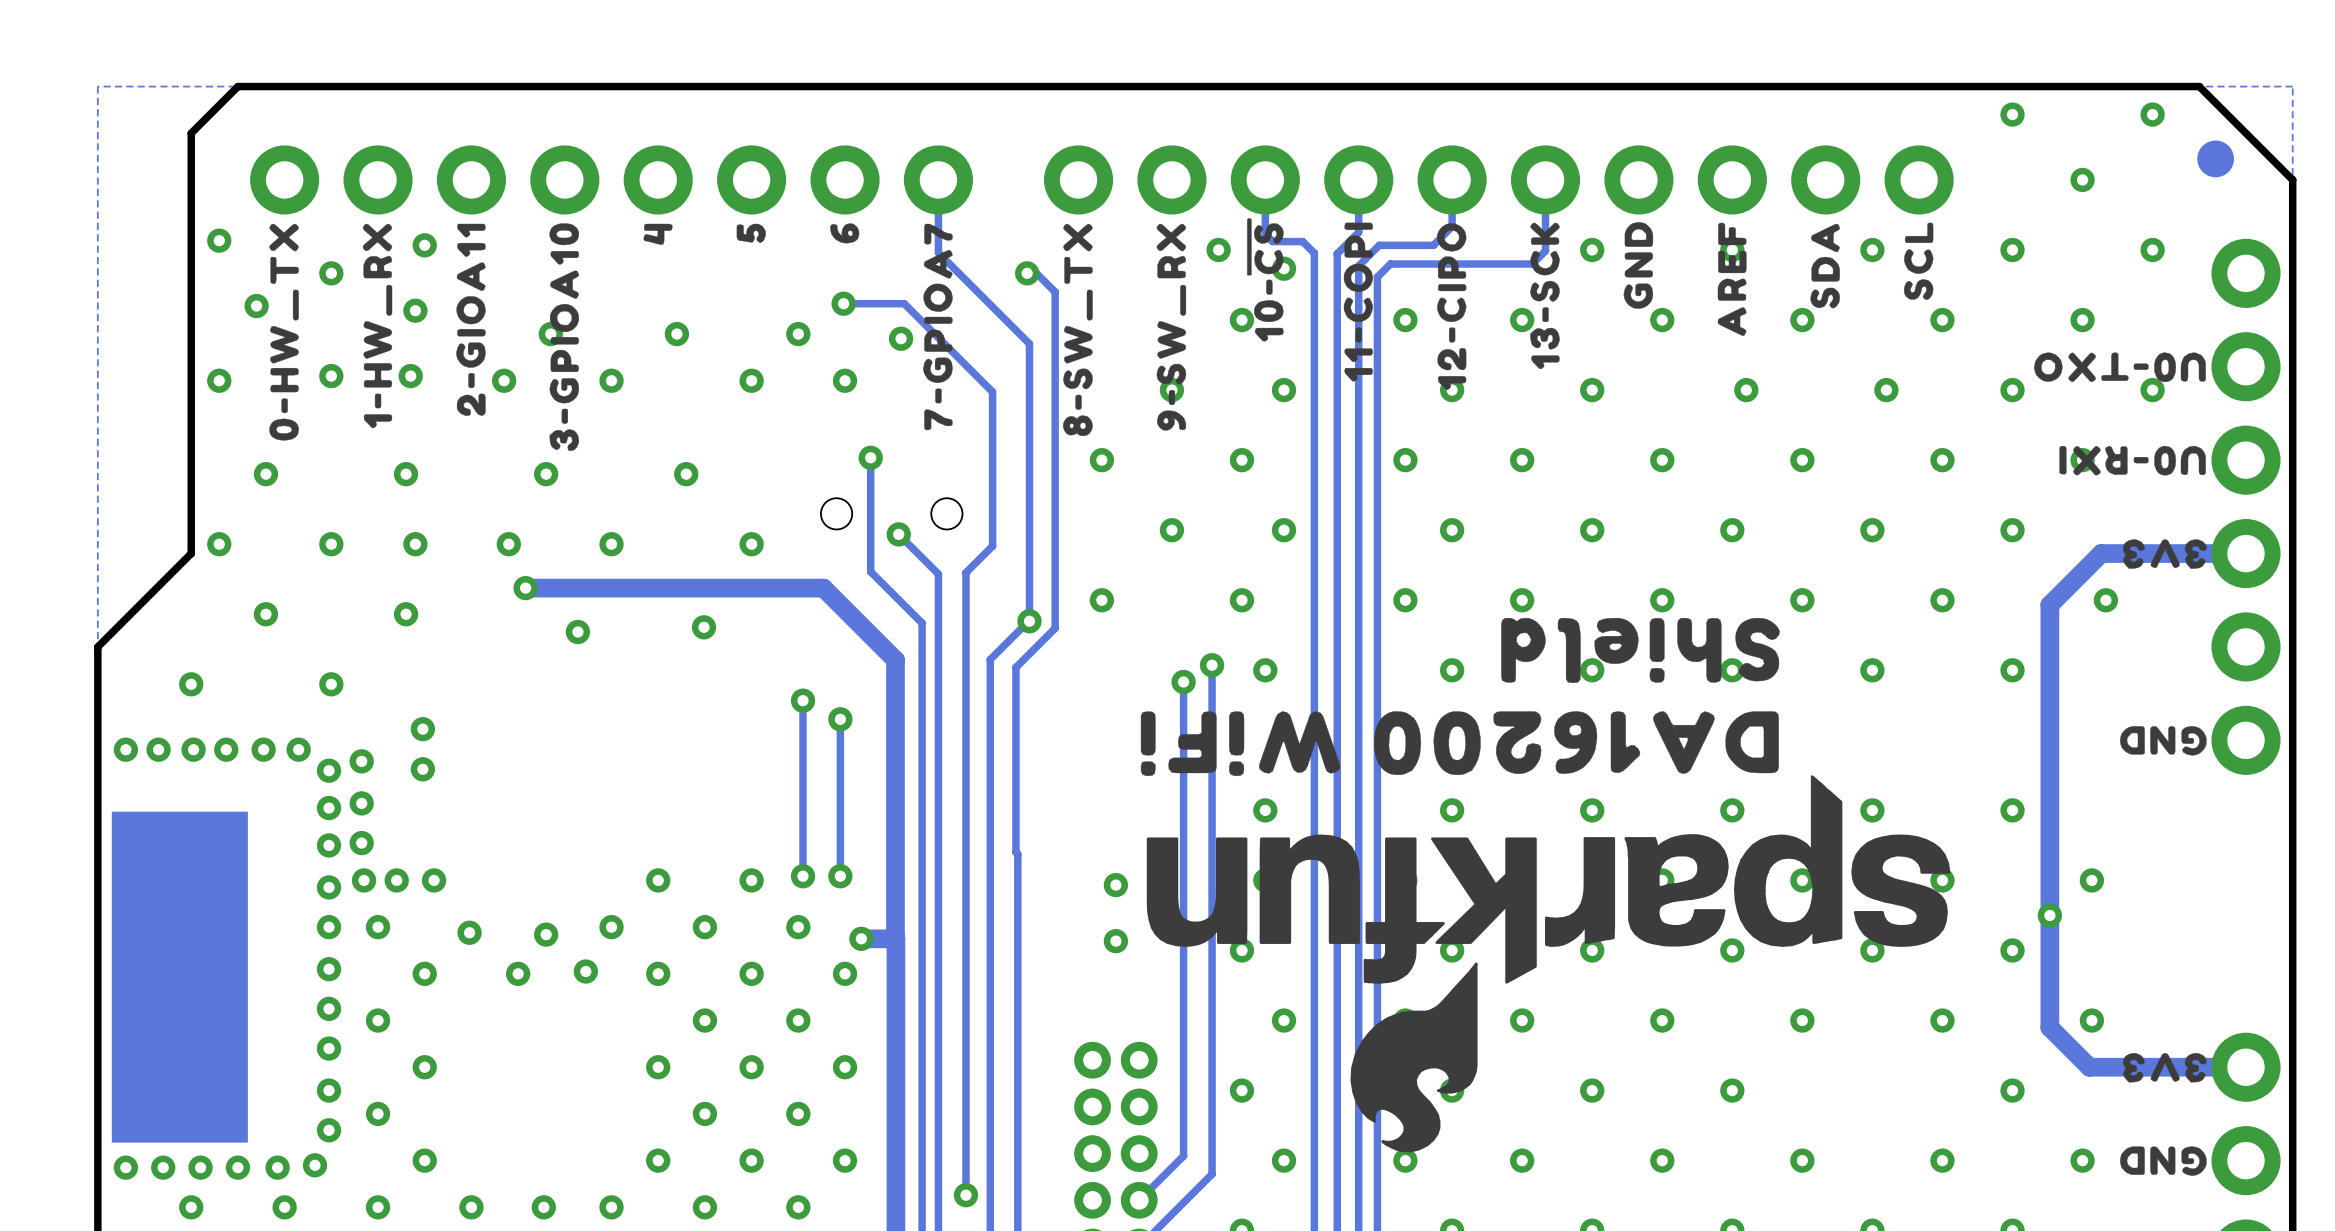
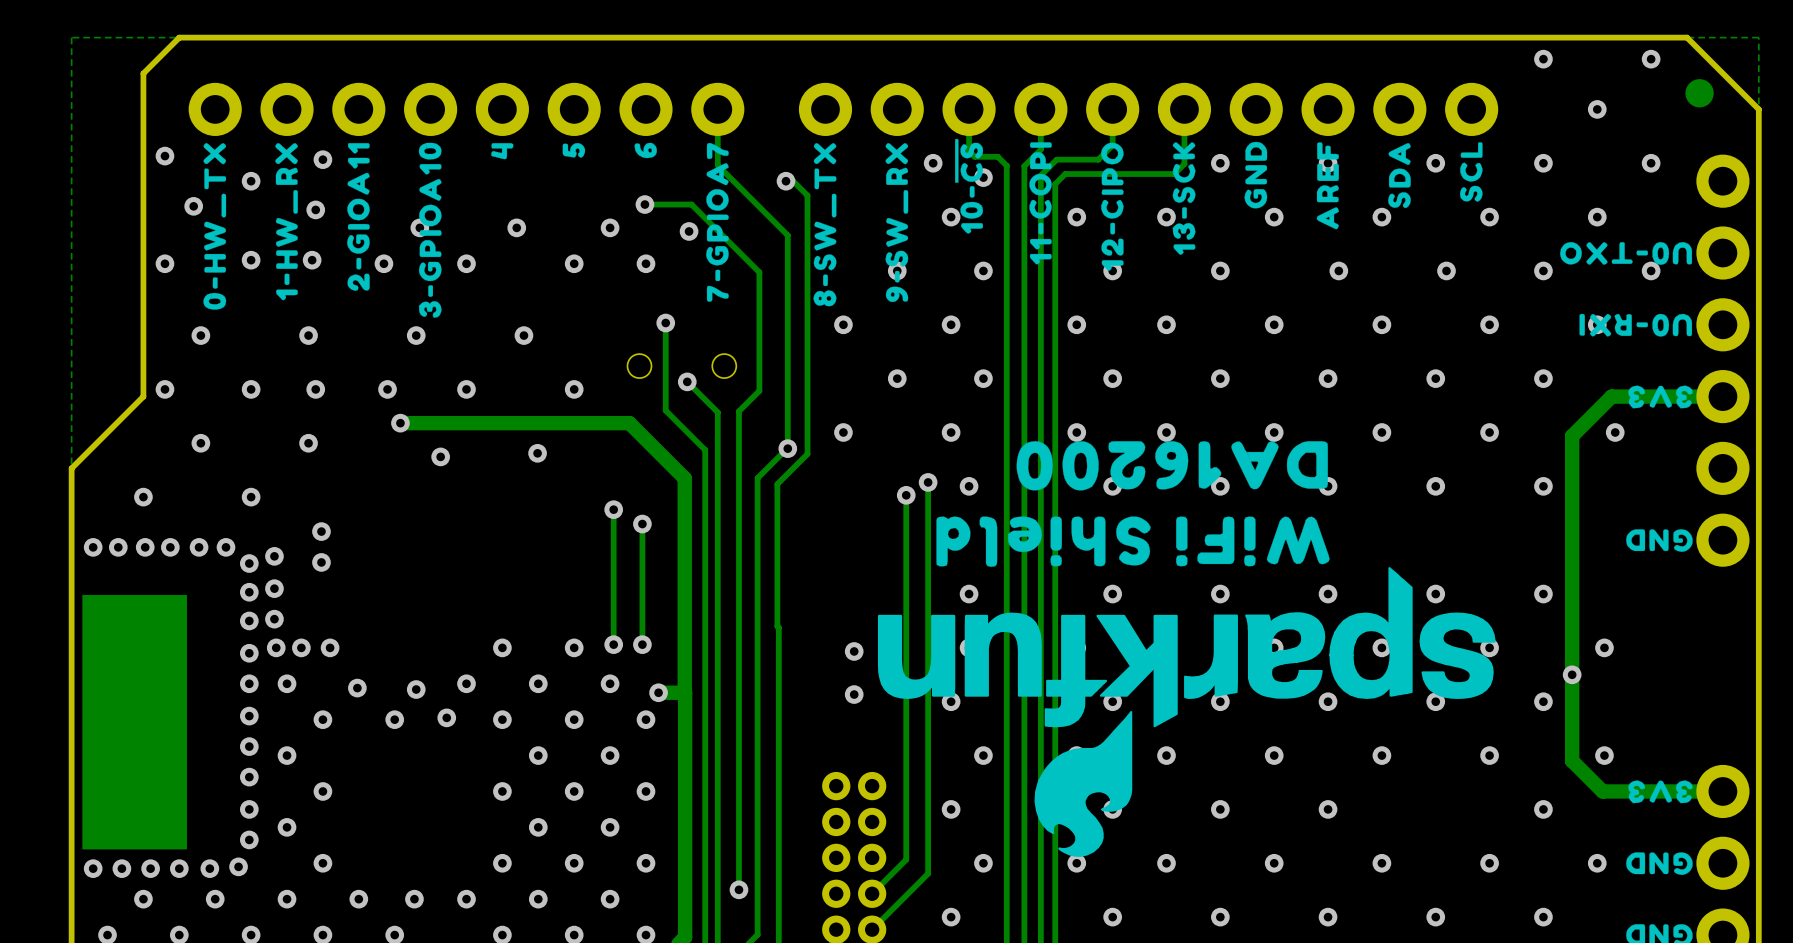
drawing: none -> [1016, 441, 1328, 491]
drawing: [1501, 617, 1780, 684] -> none
drawing shape: [1140, 711, 1779, 777] -> [936, 516, 1330, 567]

